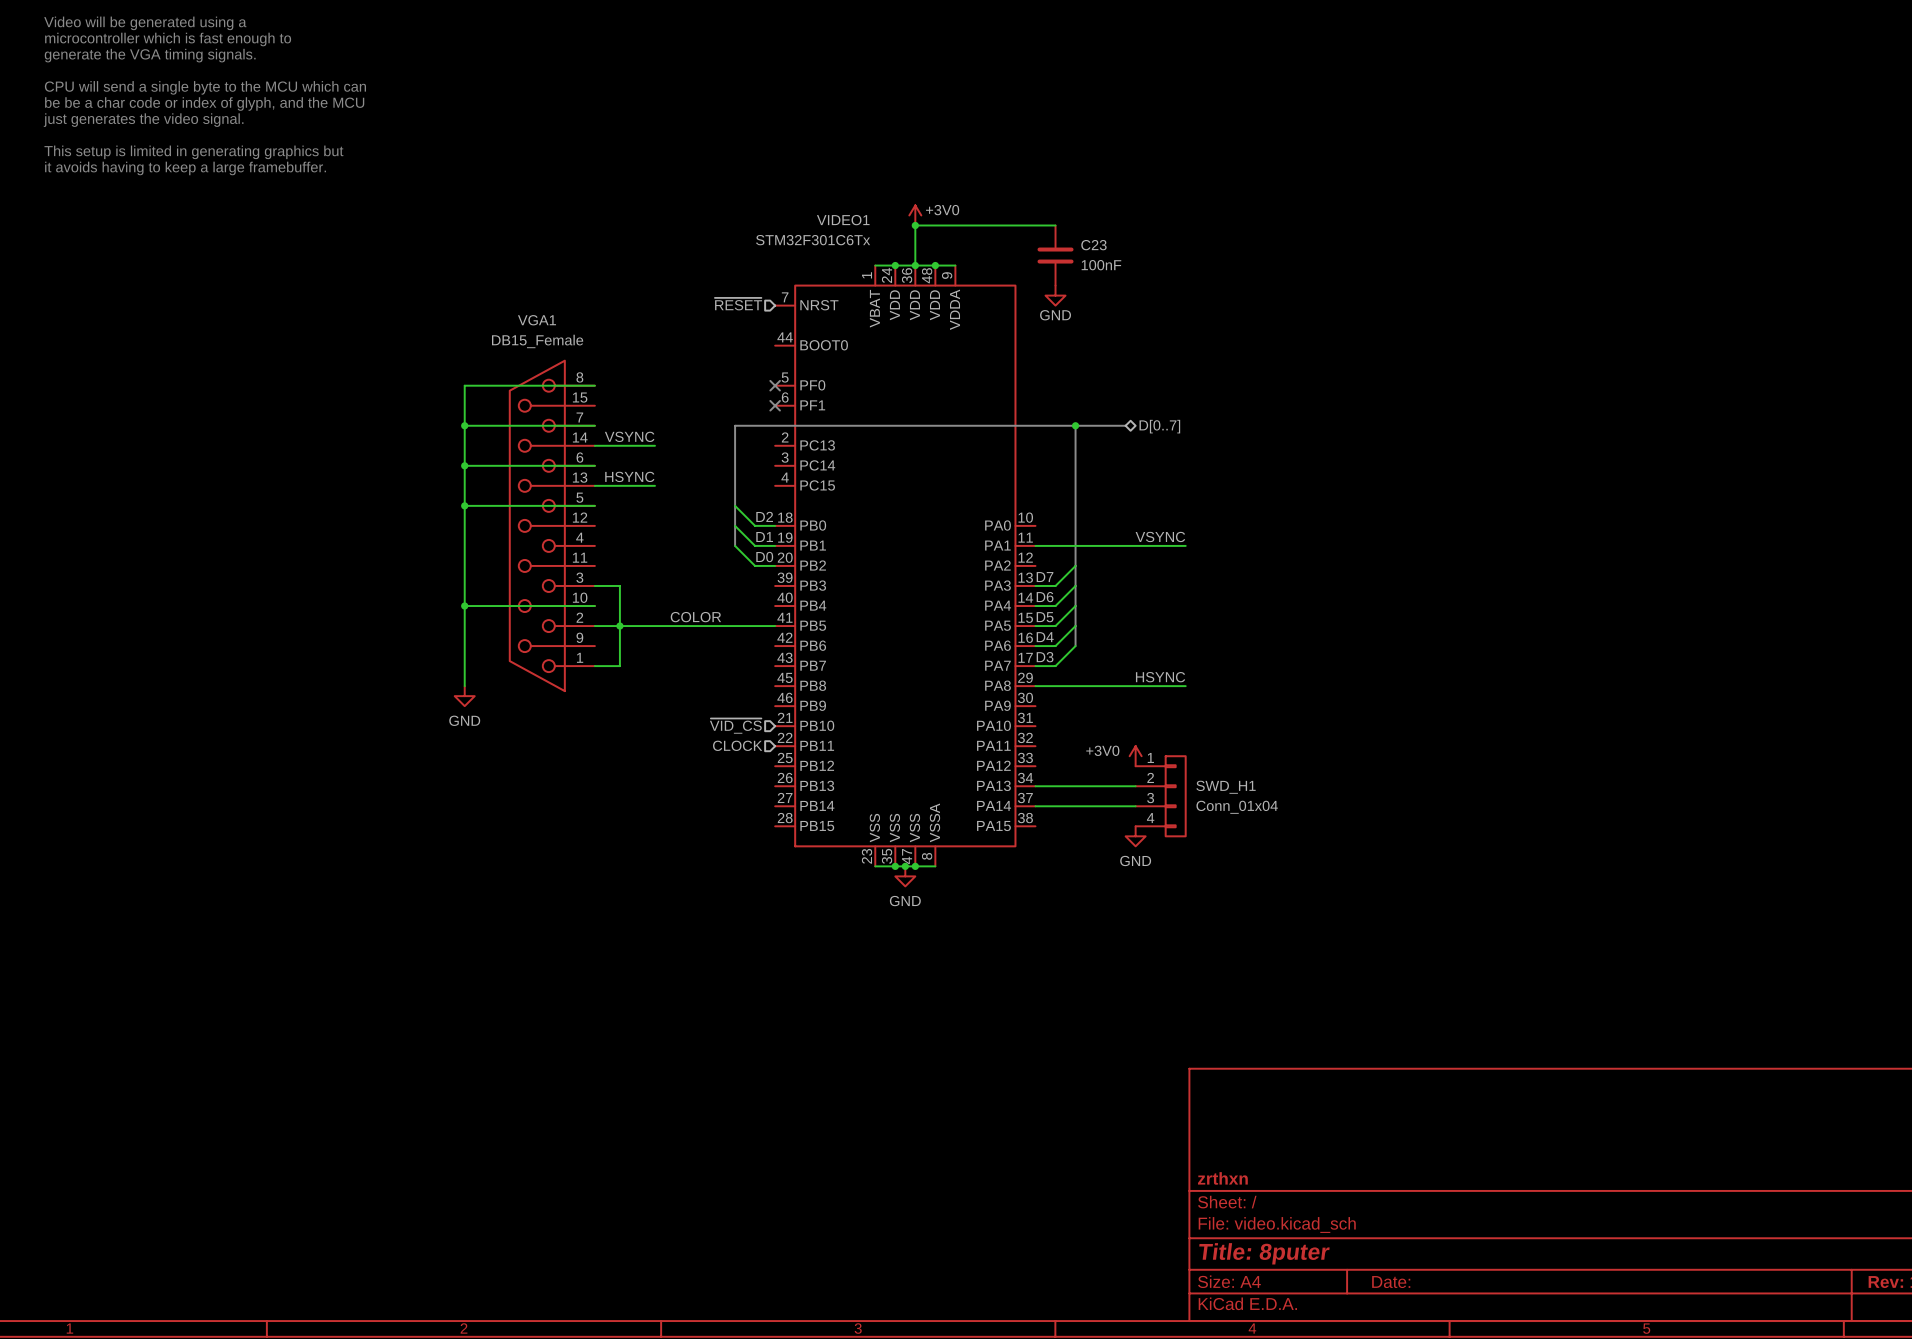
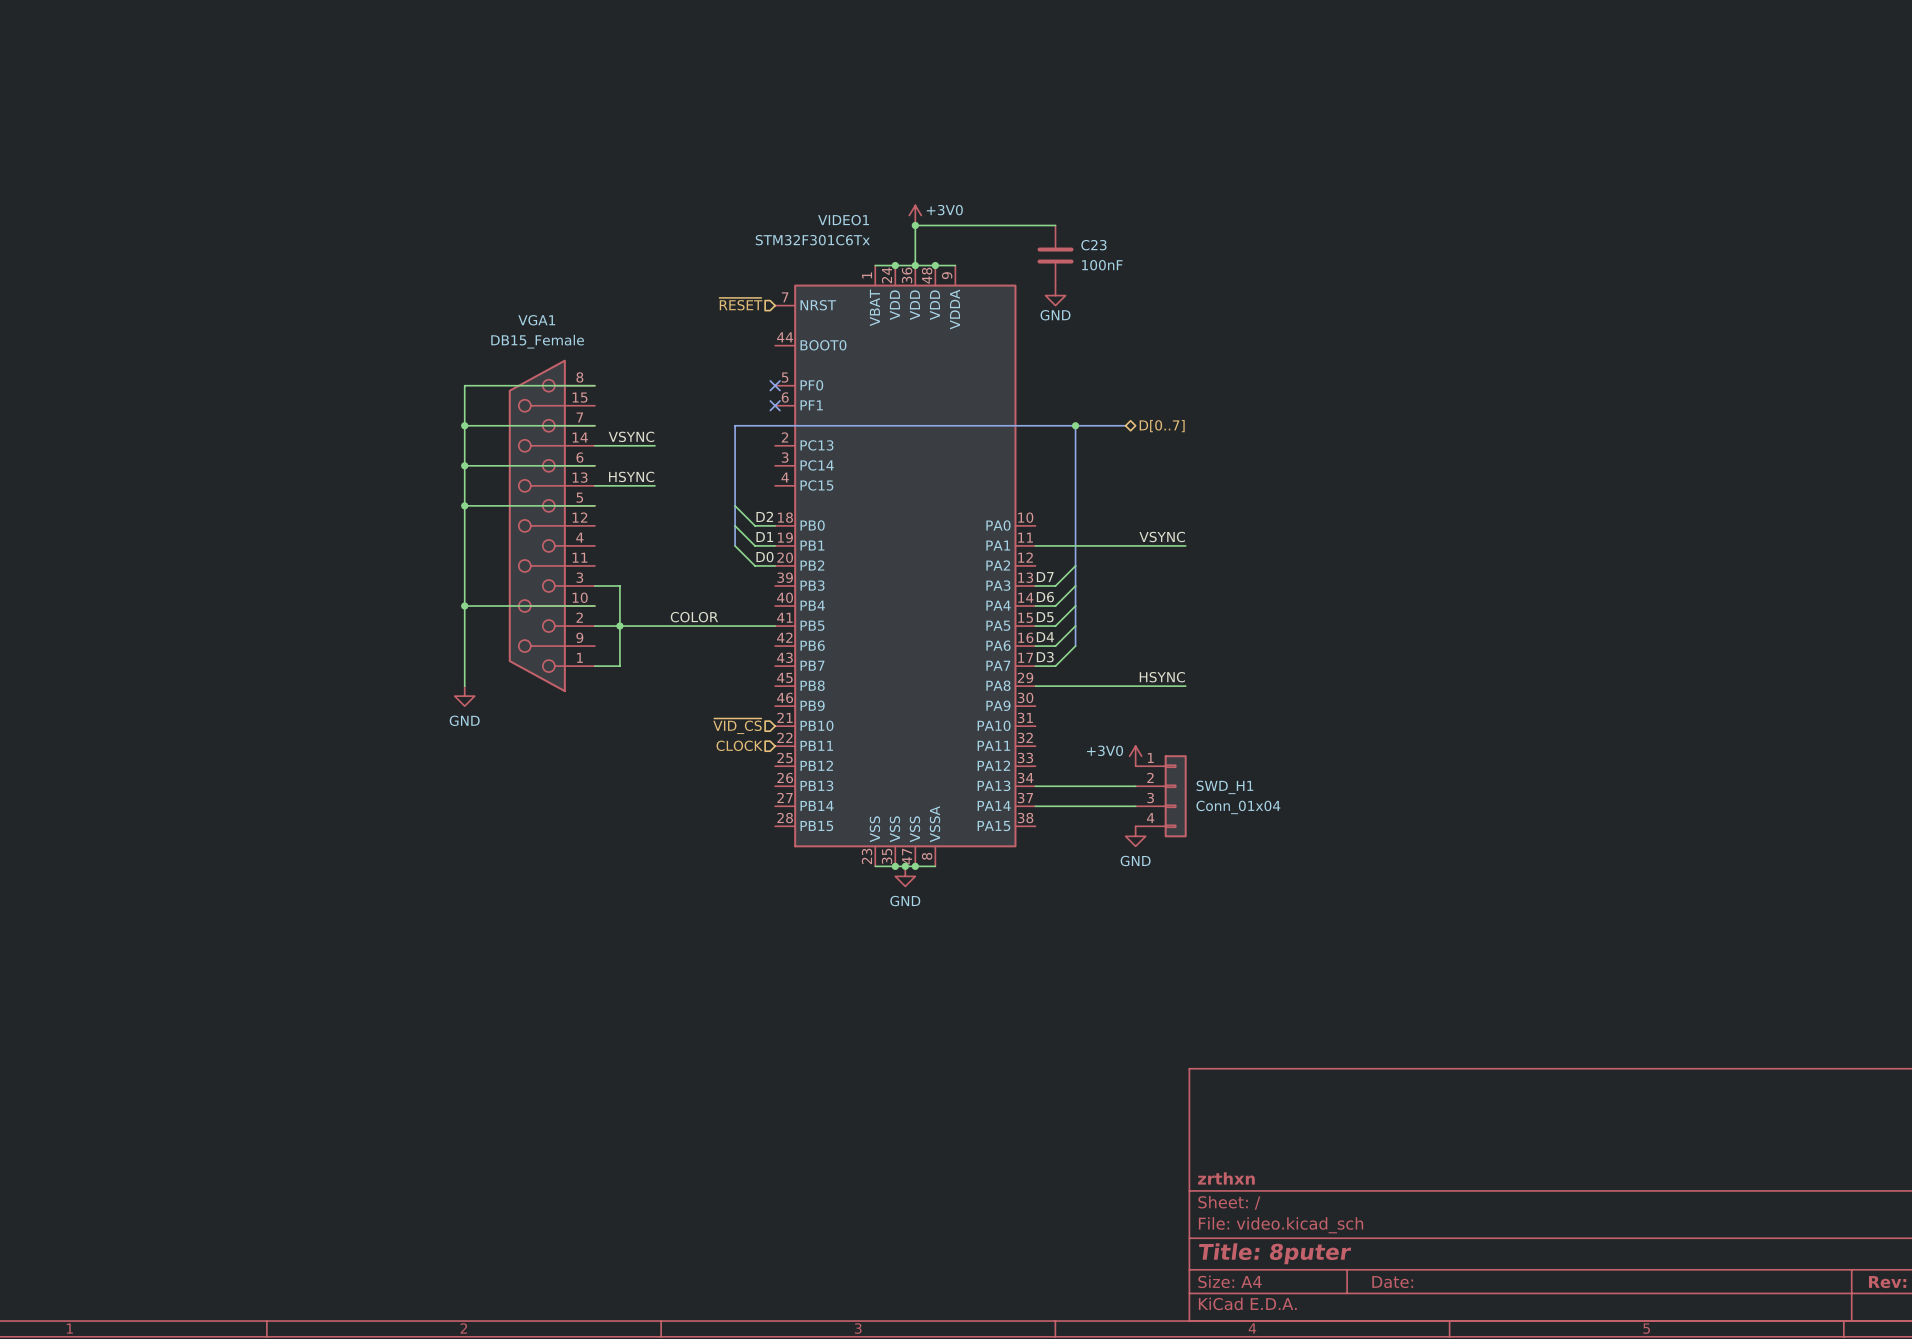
text: Video will be generated using a (145, 23) -> none
text: microcontroller which is fast enough to (168, 39) -> none
text: generate the VGA timing signals. (150, 55) -> none
text: CPU will send a single byte to the MCU which can (205, 87) -> none
text: be be a char code or index of glyph, and the MCU (204, 103) -> none
text: just generates the video signal. (143, 120) -> none
text: This setup is limited in generating graphics but (193, 152) -> none
text: it avoids having to keep a large framebuffer. (185, 168) -> none

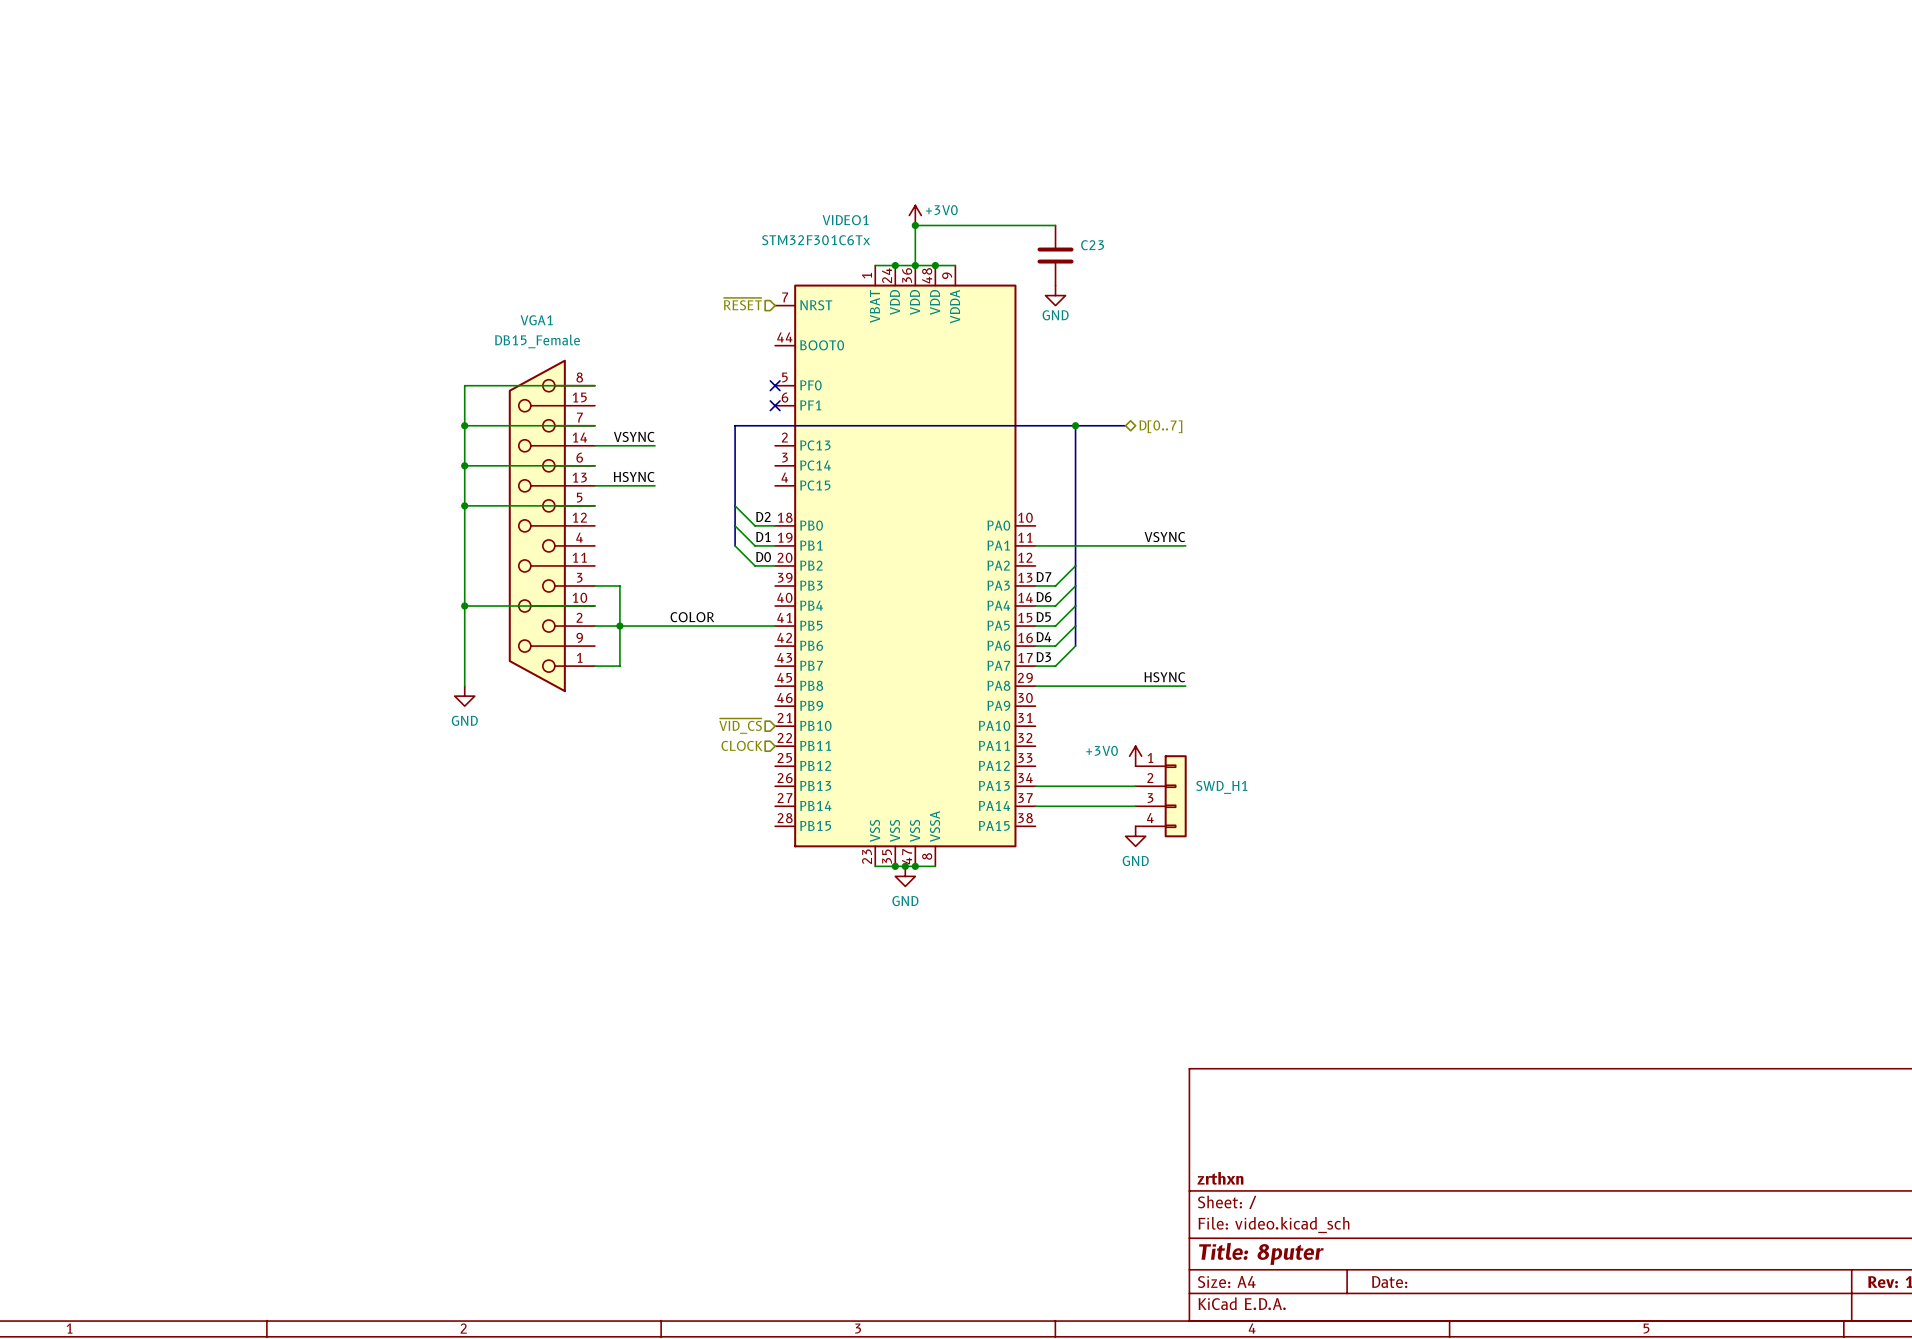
C23 value: 100nF (1102, 265) -> none
SWD_H1 value: Conn_01x04 (1238, 807) -> none

